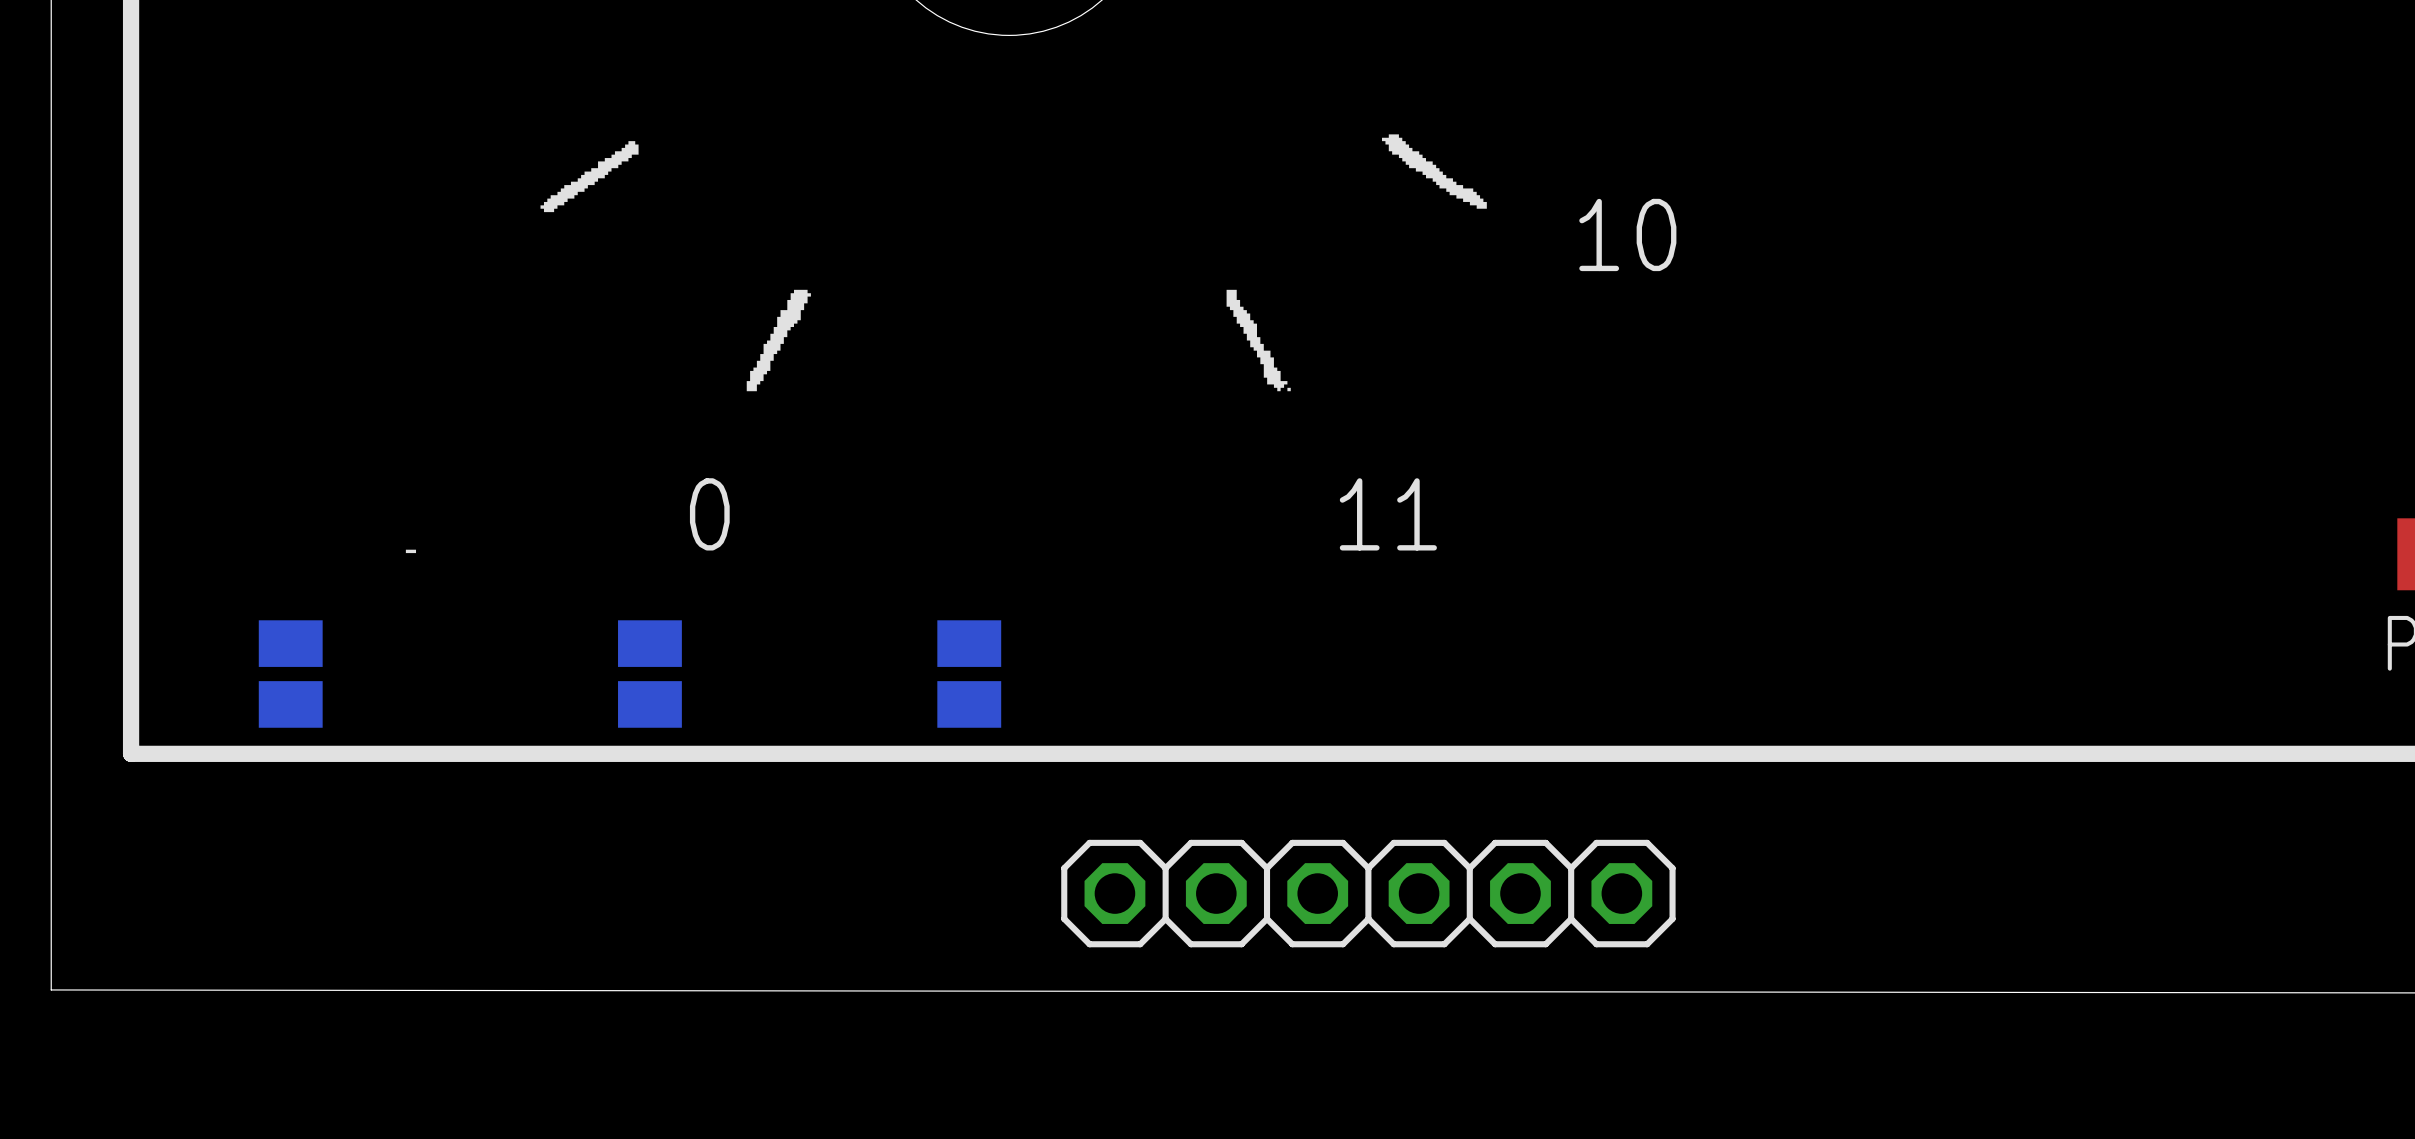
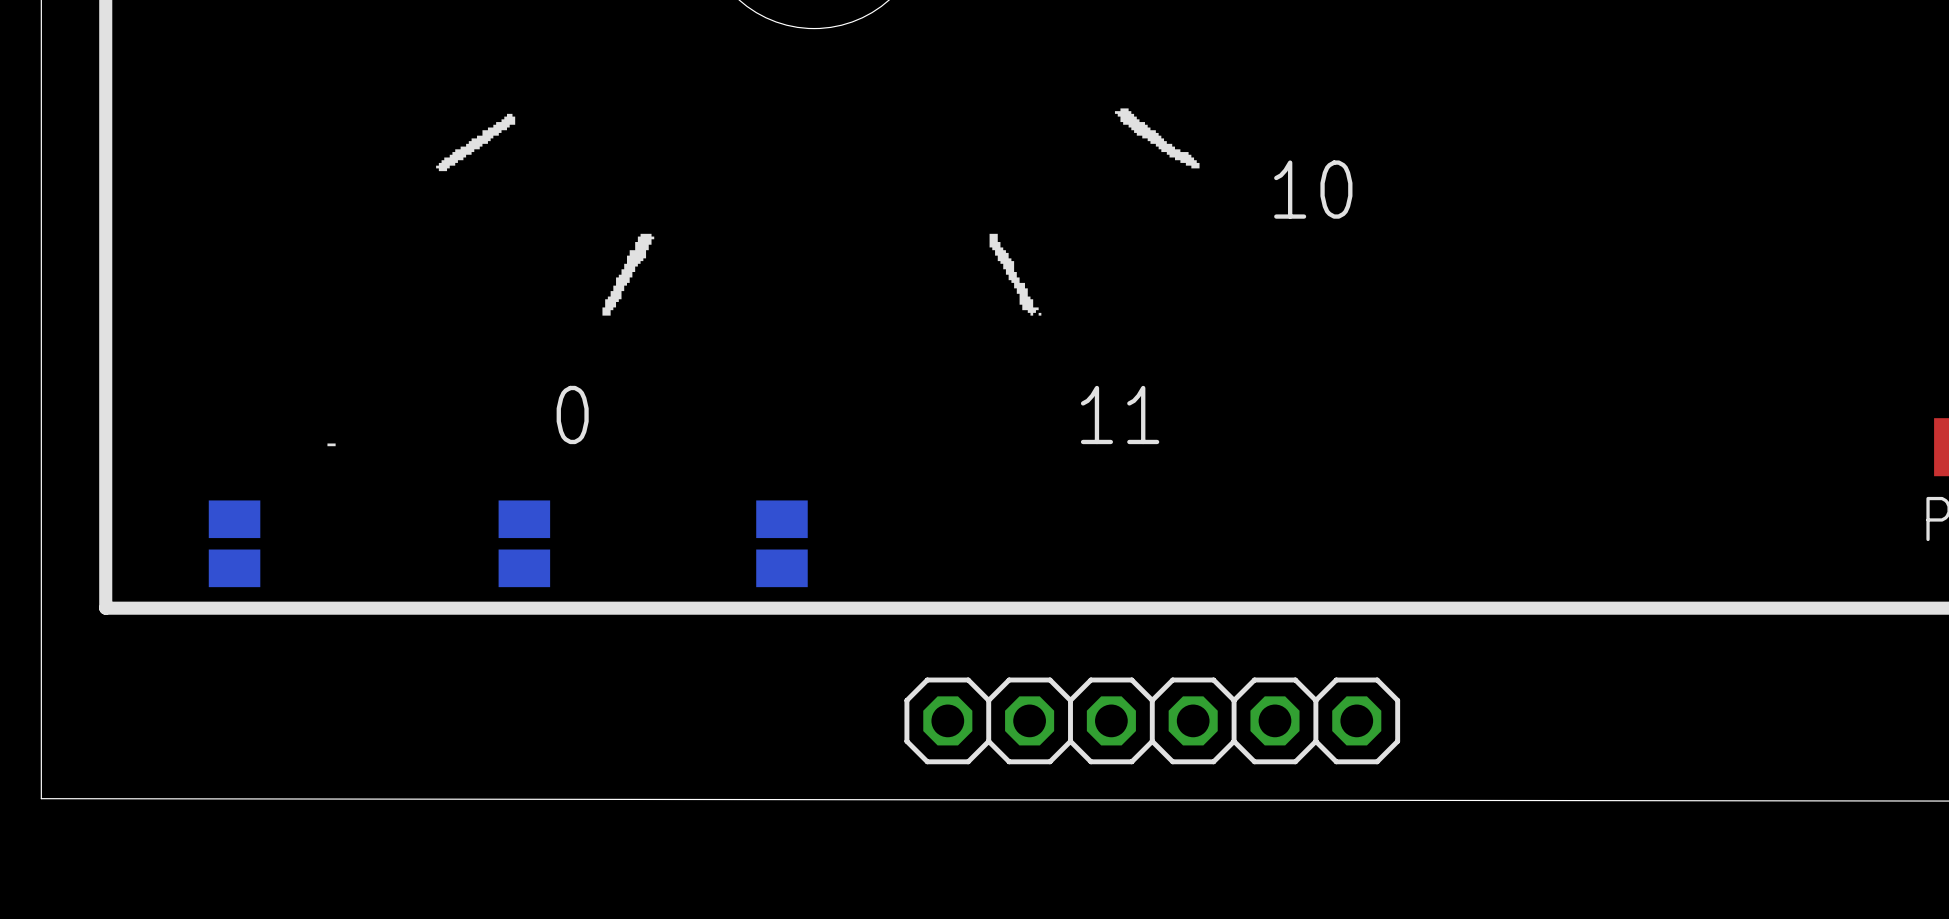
part position: (1368, 893) -> (1152, 720)

